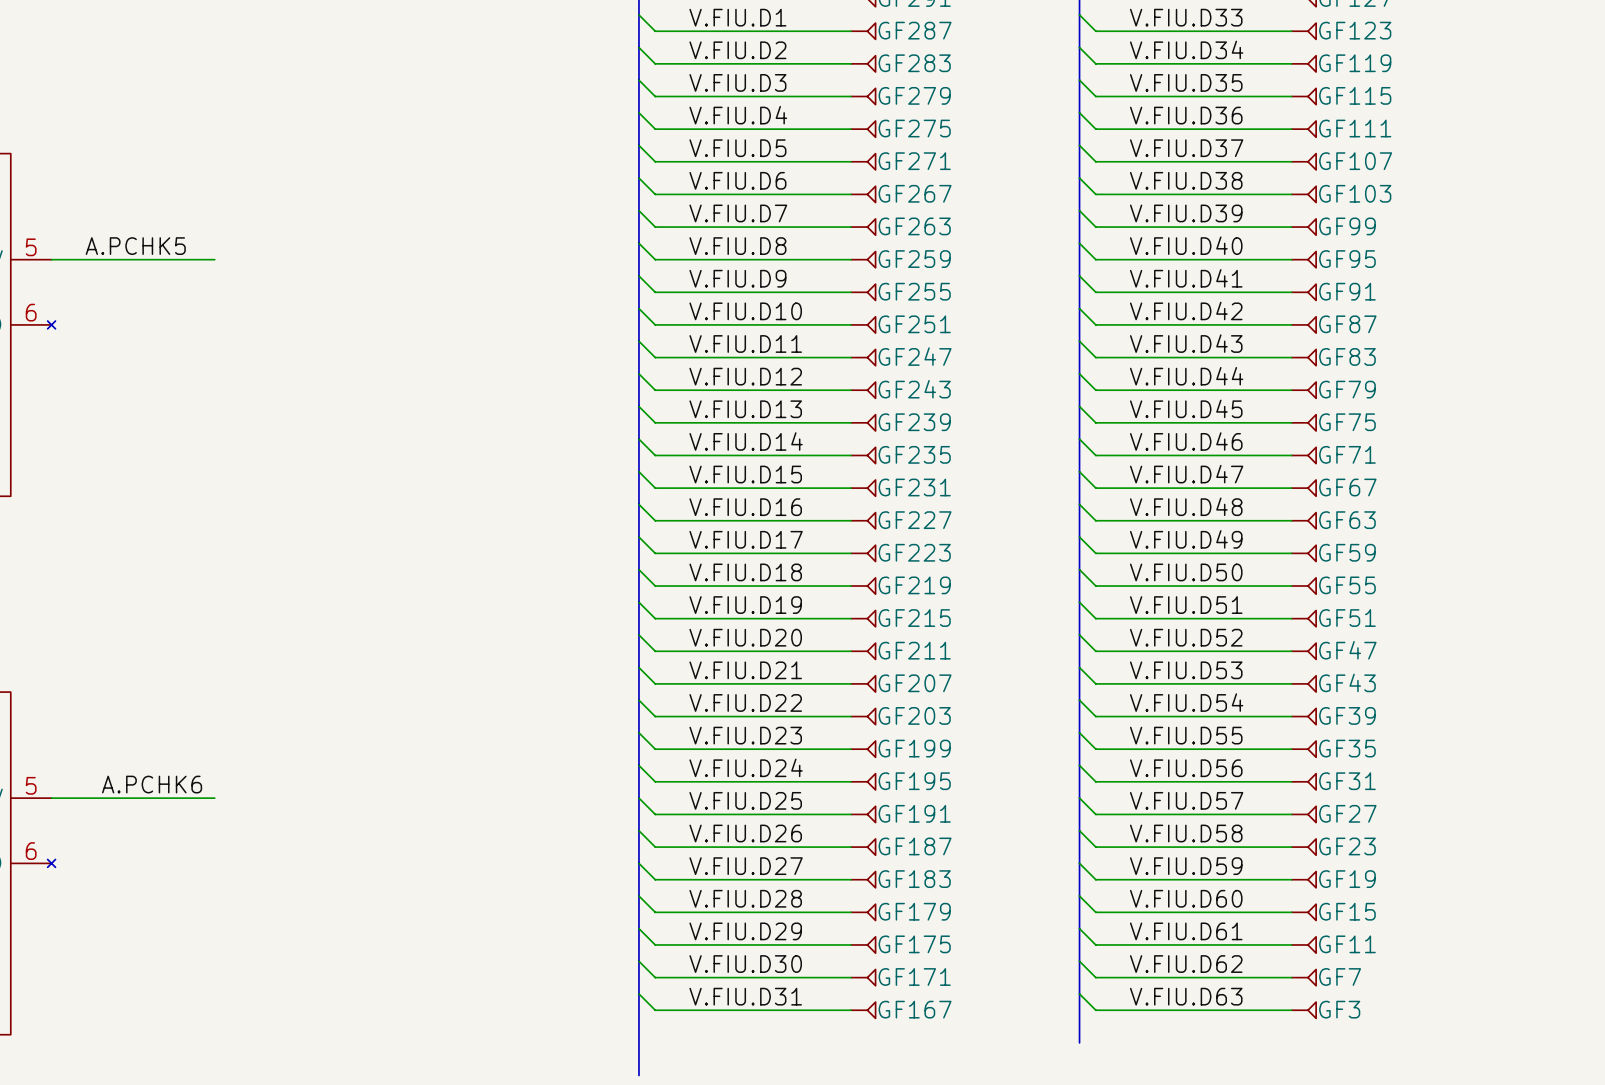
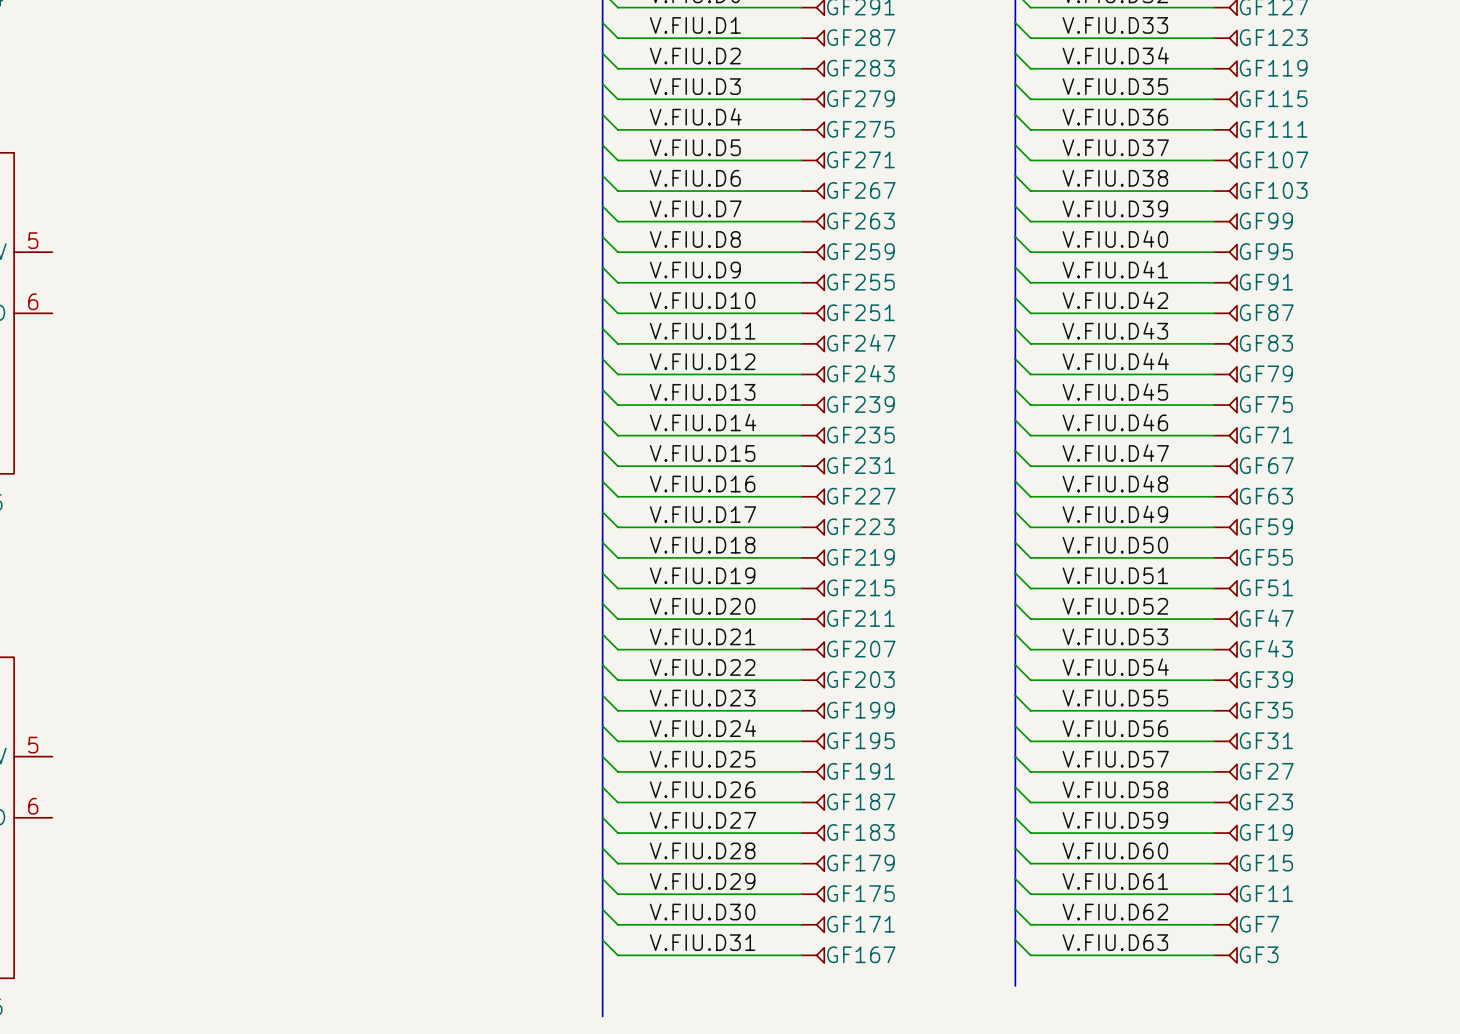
label: A.PCHK5 (135, 246) -> none
wire: (51, 259) (214, 259) -> none
no-connect mark: (51, 324) -> none
label: A.PCHK6 (152, 784) -> none
wire: (51, 798) (214, 798) -> none
no-connect mark: (51, 863) -> none

